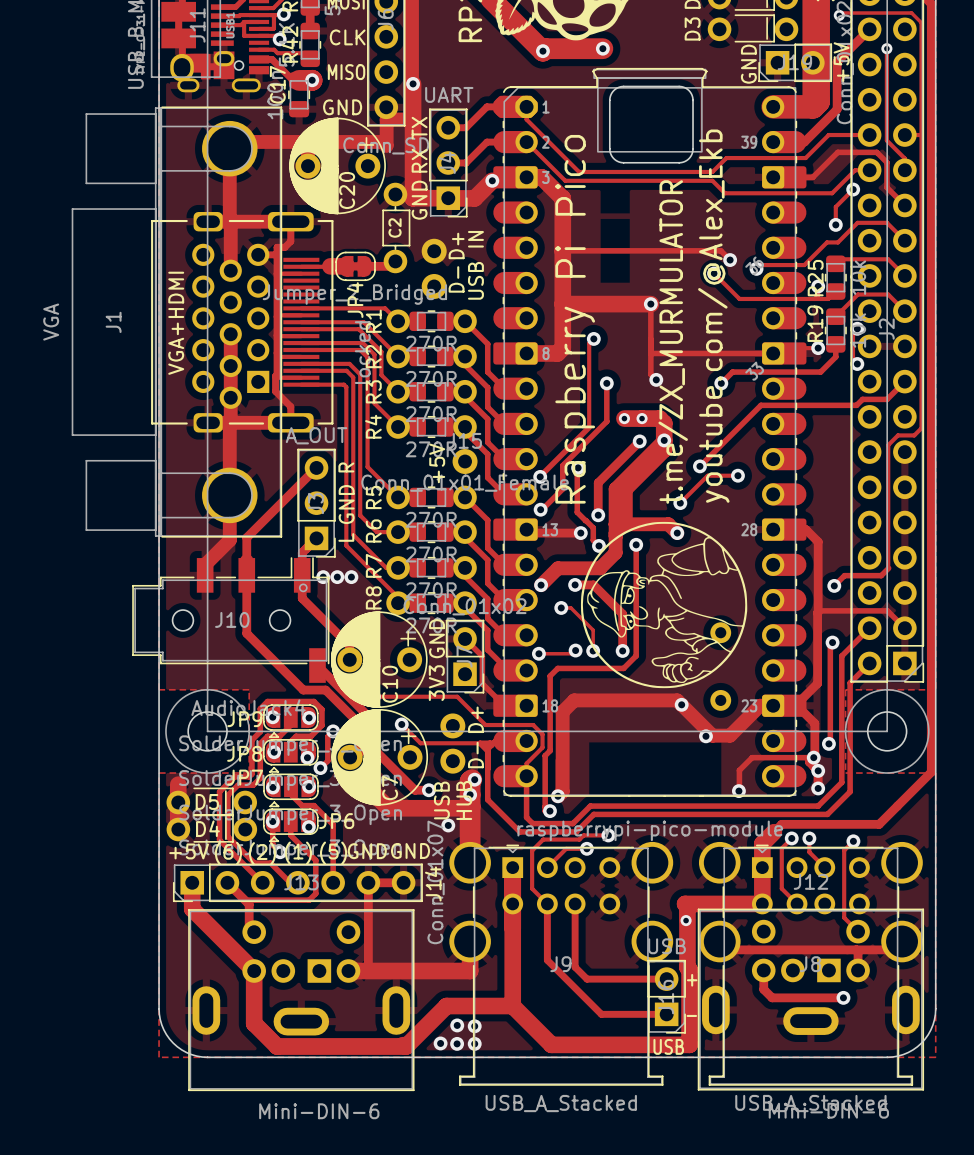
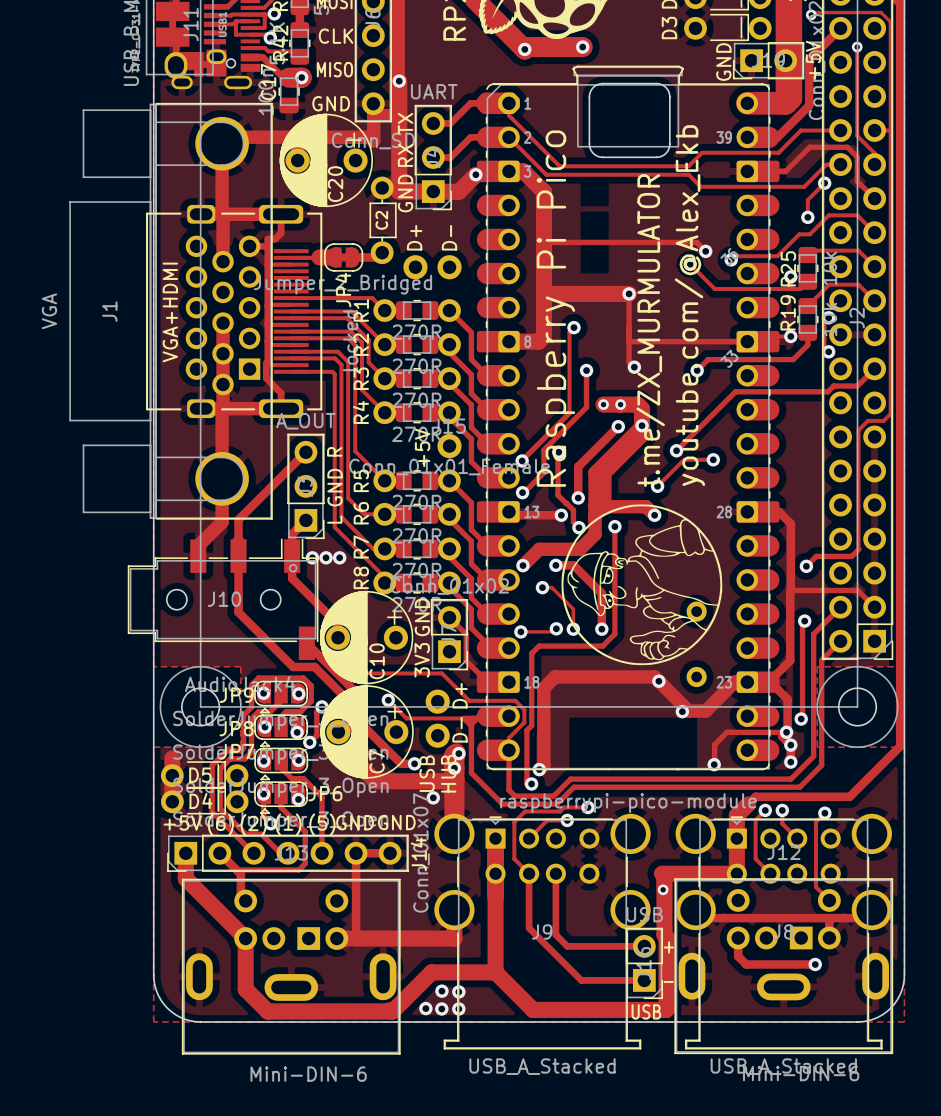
text: none -> D+ (414, 237)
text: D+ (456, 245) -> D- (449, 237)
text: USB IN (475, 265) -> none
part rotation: 0° (434, 268) -> 90° clockwise (432, 267)
text: D- (456, 279) -> none

